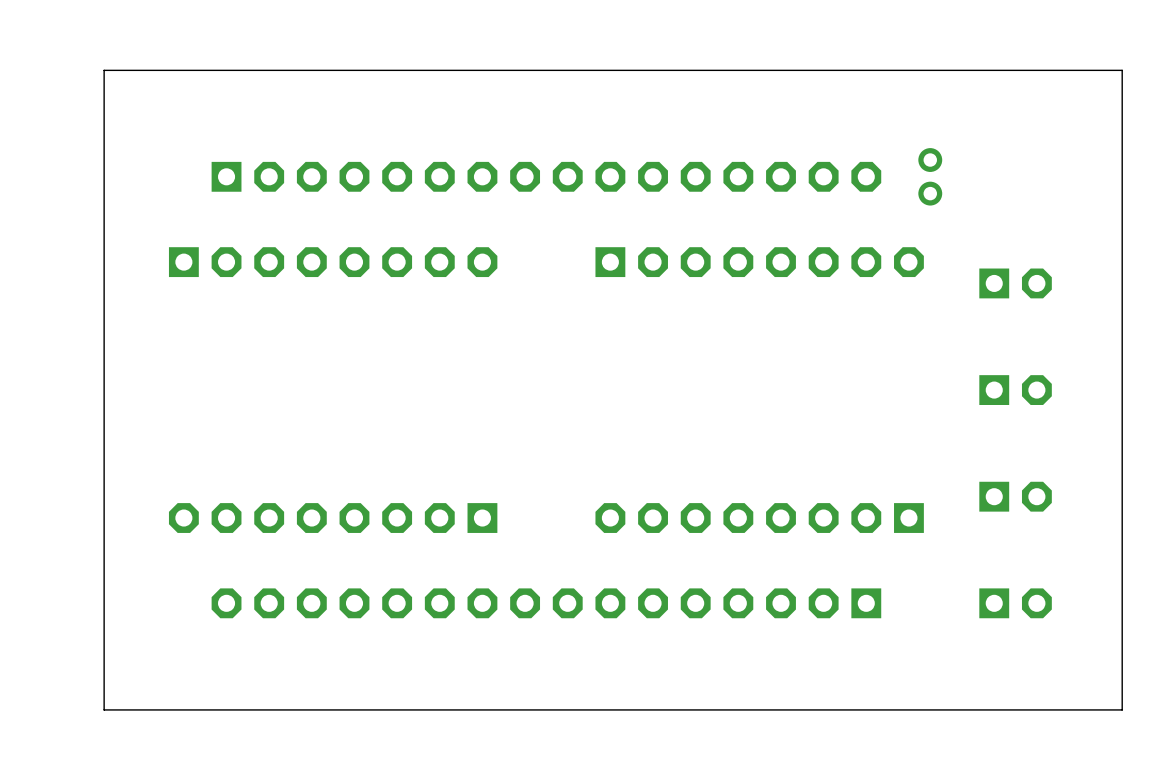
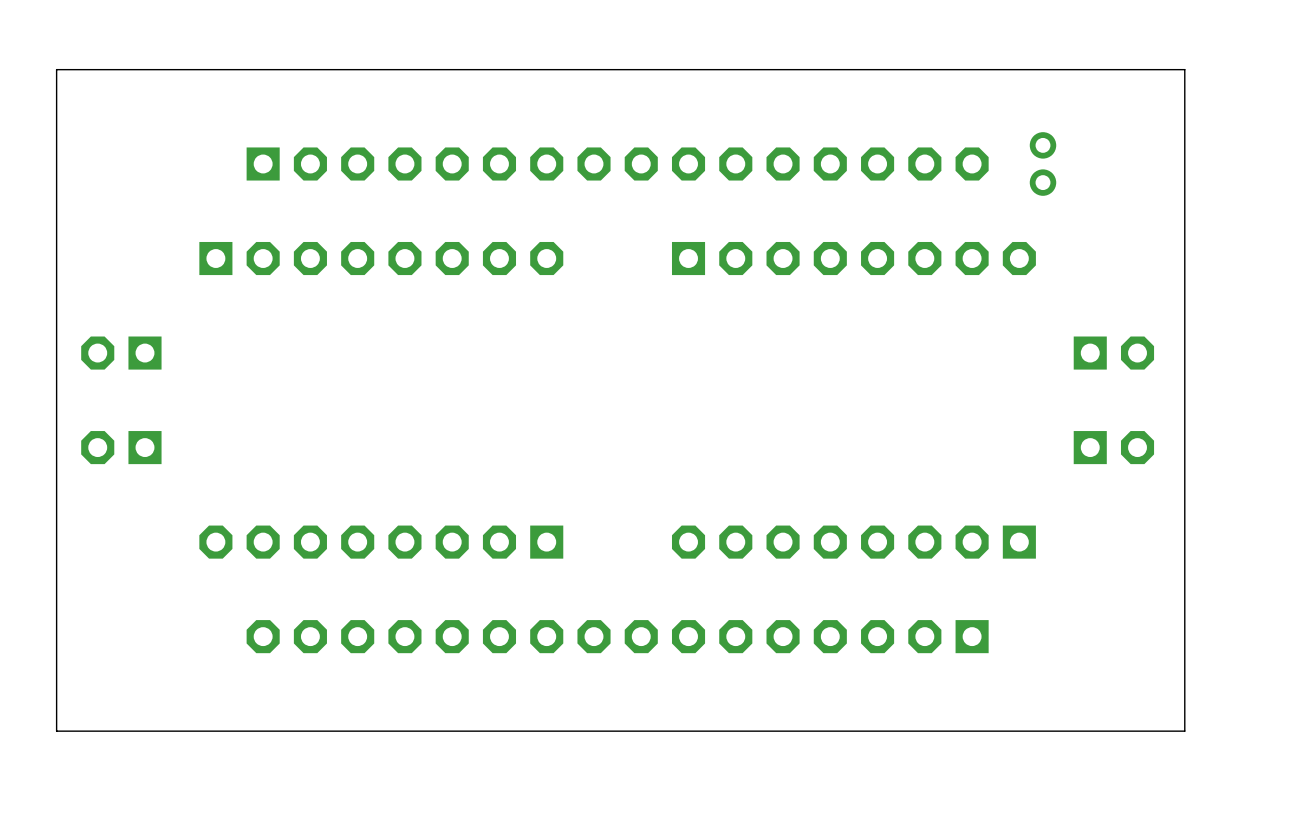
board edge: (1122, 70) (104, 70) (104, 709) (1122, 709) (1122, 70) -> (1184, 69) (1184, 731) (56, 731) (56, 69) (1184, 69)
part: (1015, 283) -> none
part: none -> (121, 353)
part: none -> (1113, 353)
part: (1015, 390) -> none
part: none -> (121, 447)
part: none -> (1113, 447)
part: (1015, 496) -> none
part: (1015, 603) -> none

